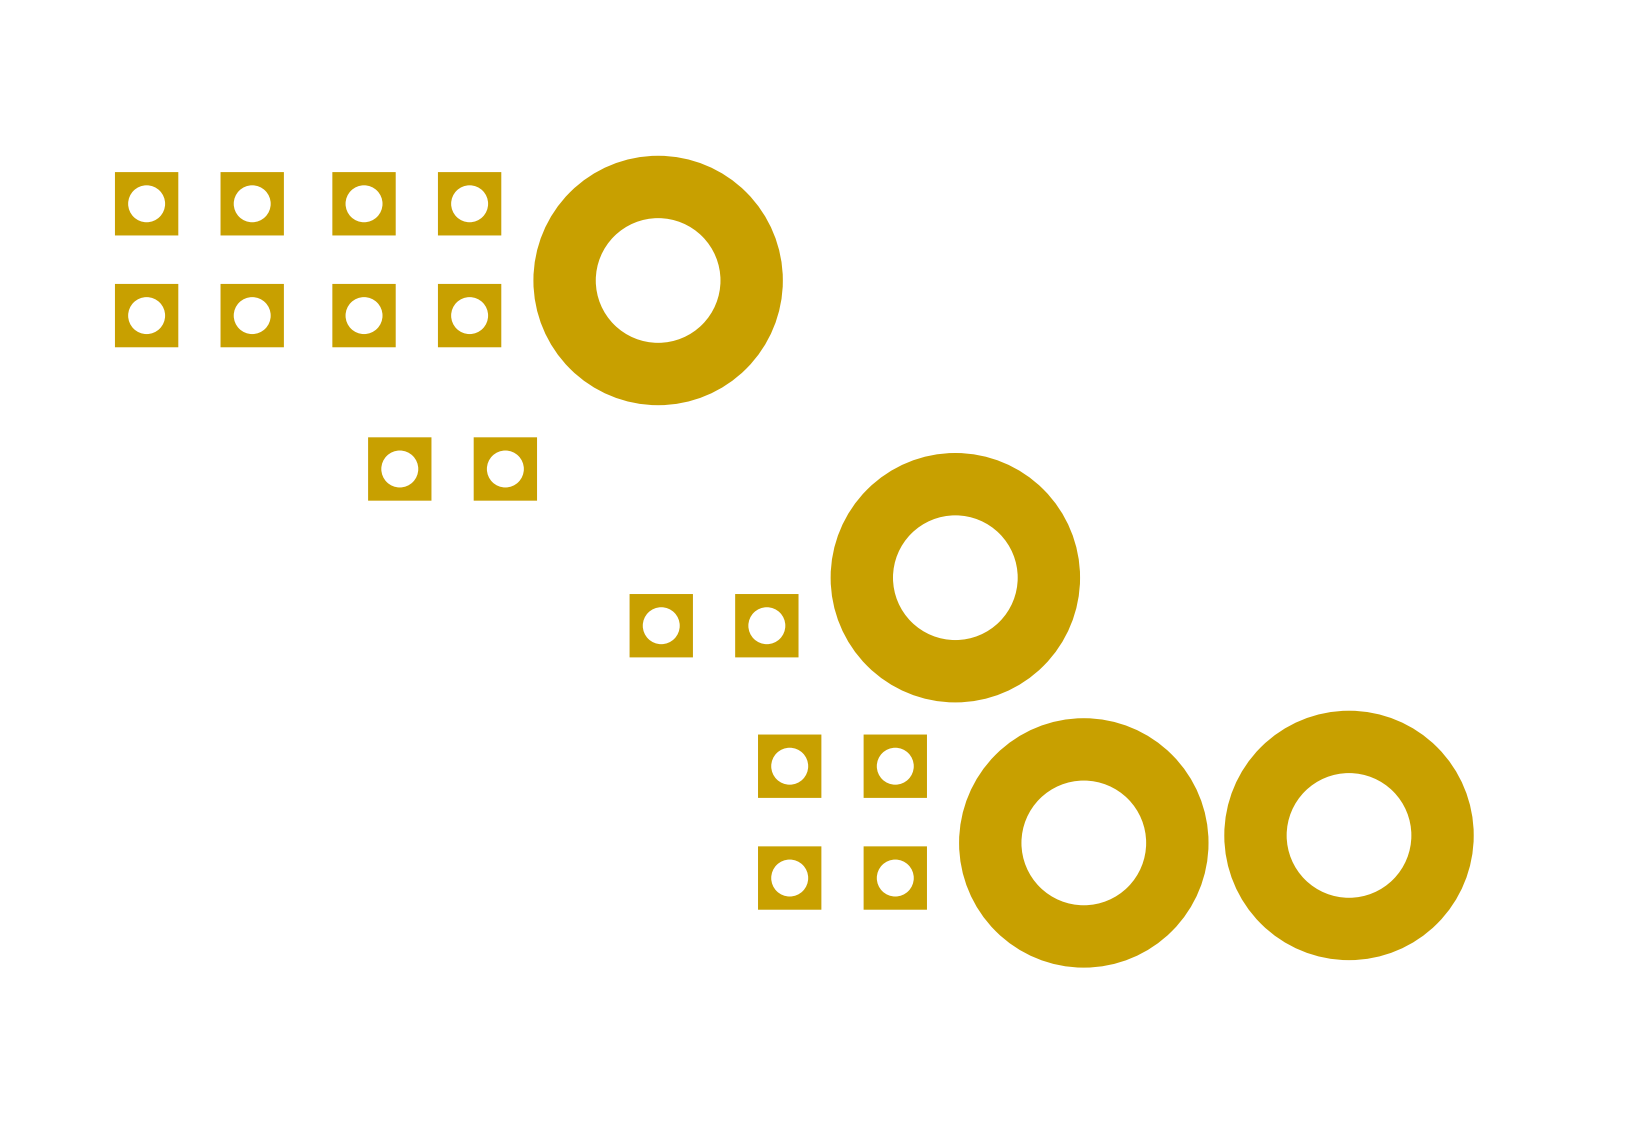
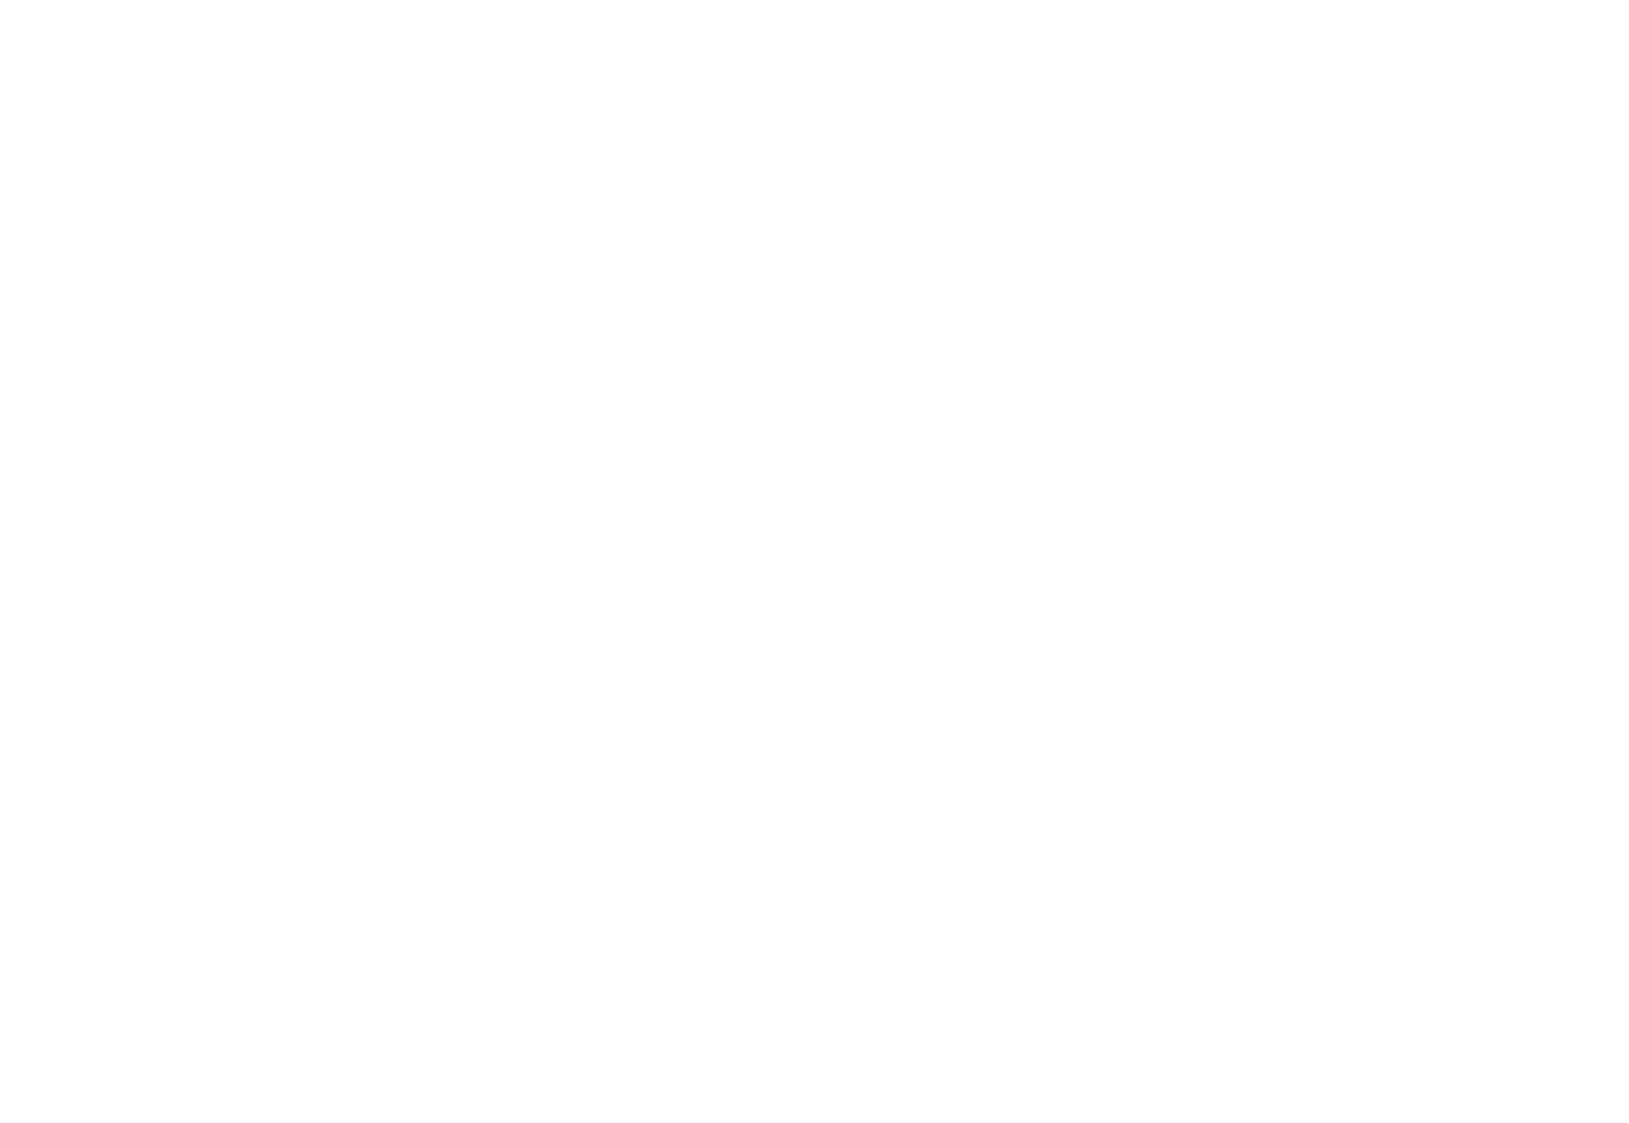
part: (199, 203) -> none
part: (416, 203) -> none
part: (658, 280) -> none
part: (199, 315) -> none
part: (416, 315) -> none
part: (452, 468) -> none
part: (955, 577) -> none
part: (714, 625) -> none
part: (842, 766) -> none
part: (1349, 835) -> none
part: (1083, 842) -> none
part: (842, 878) -> none

